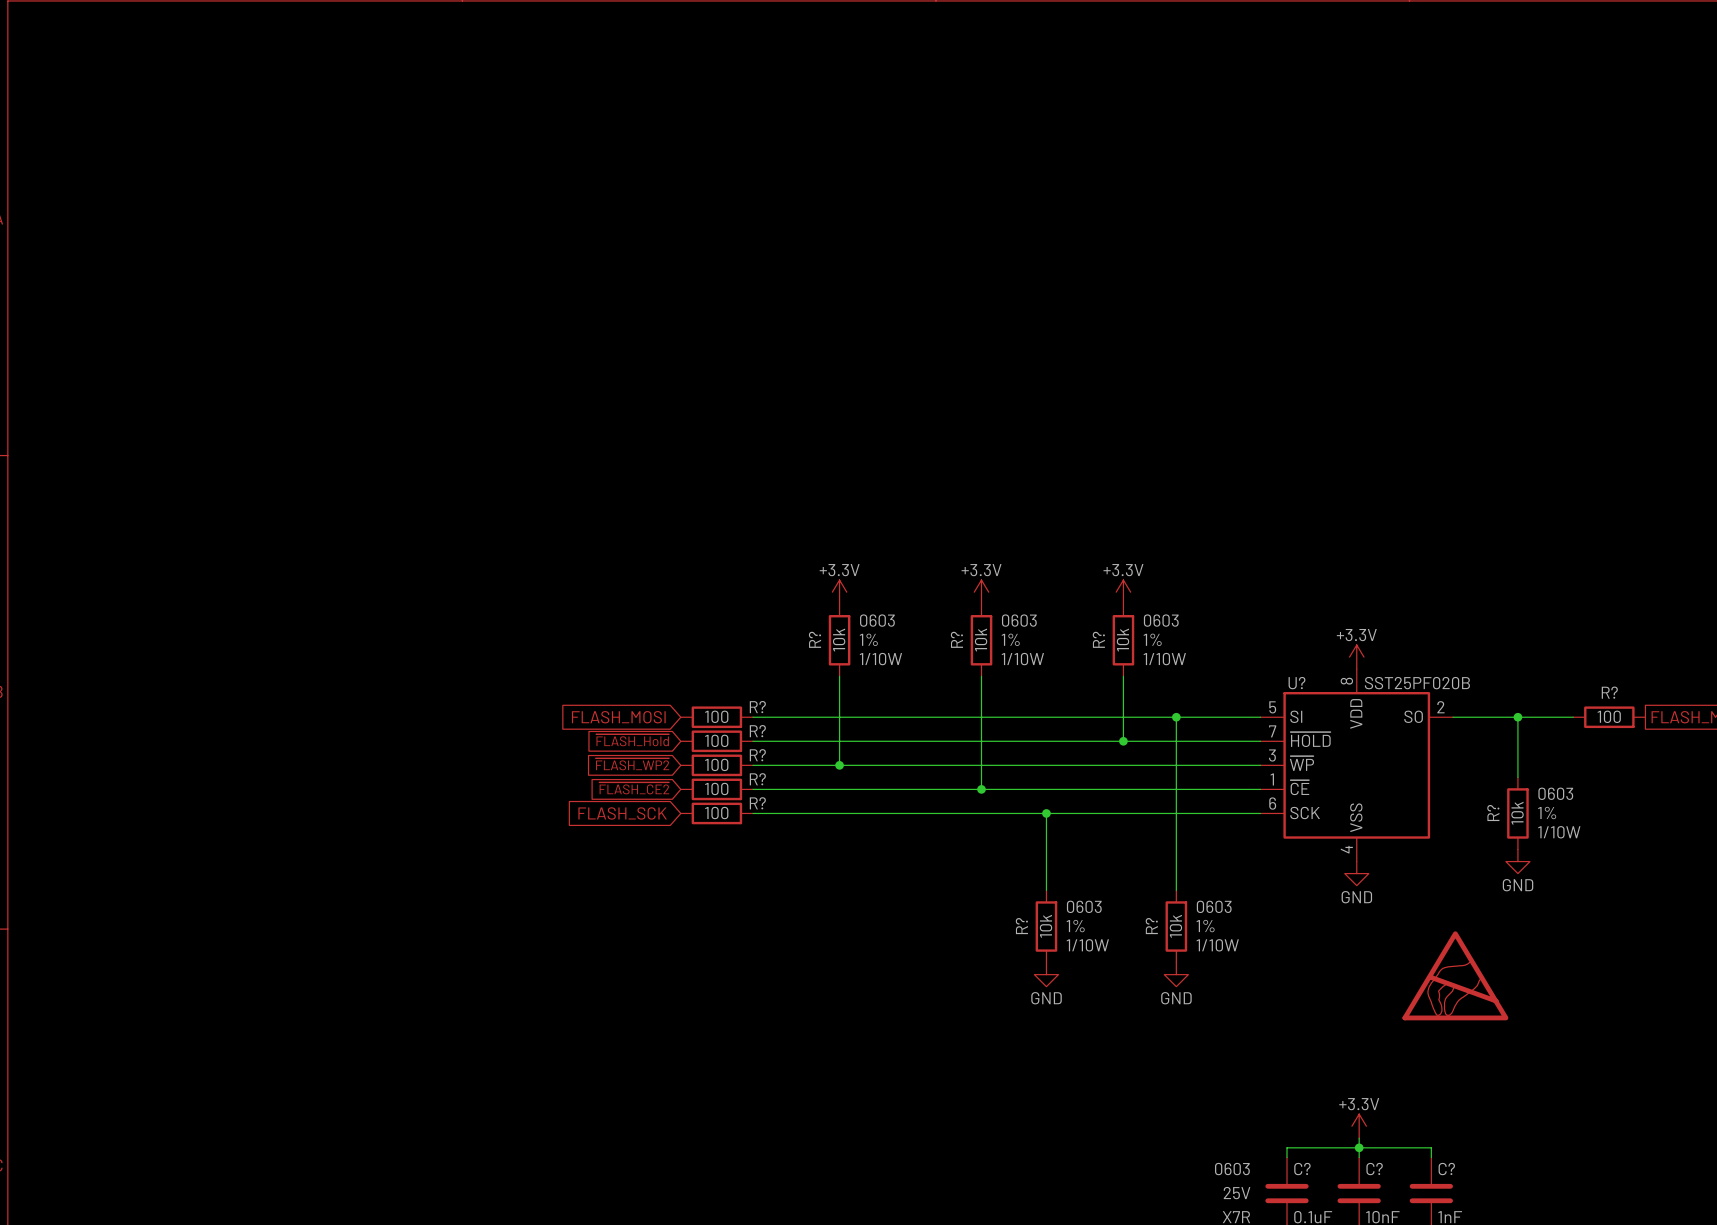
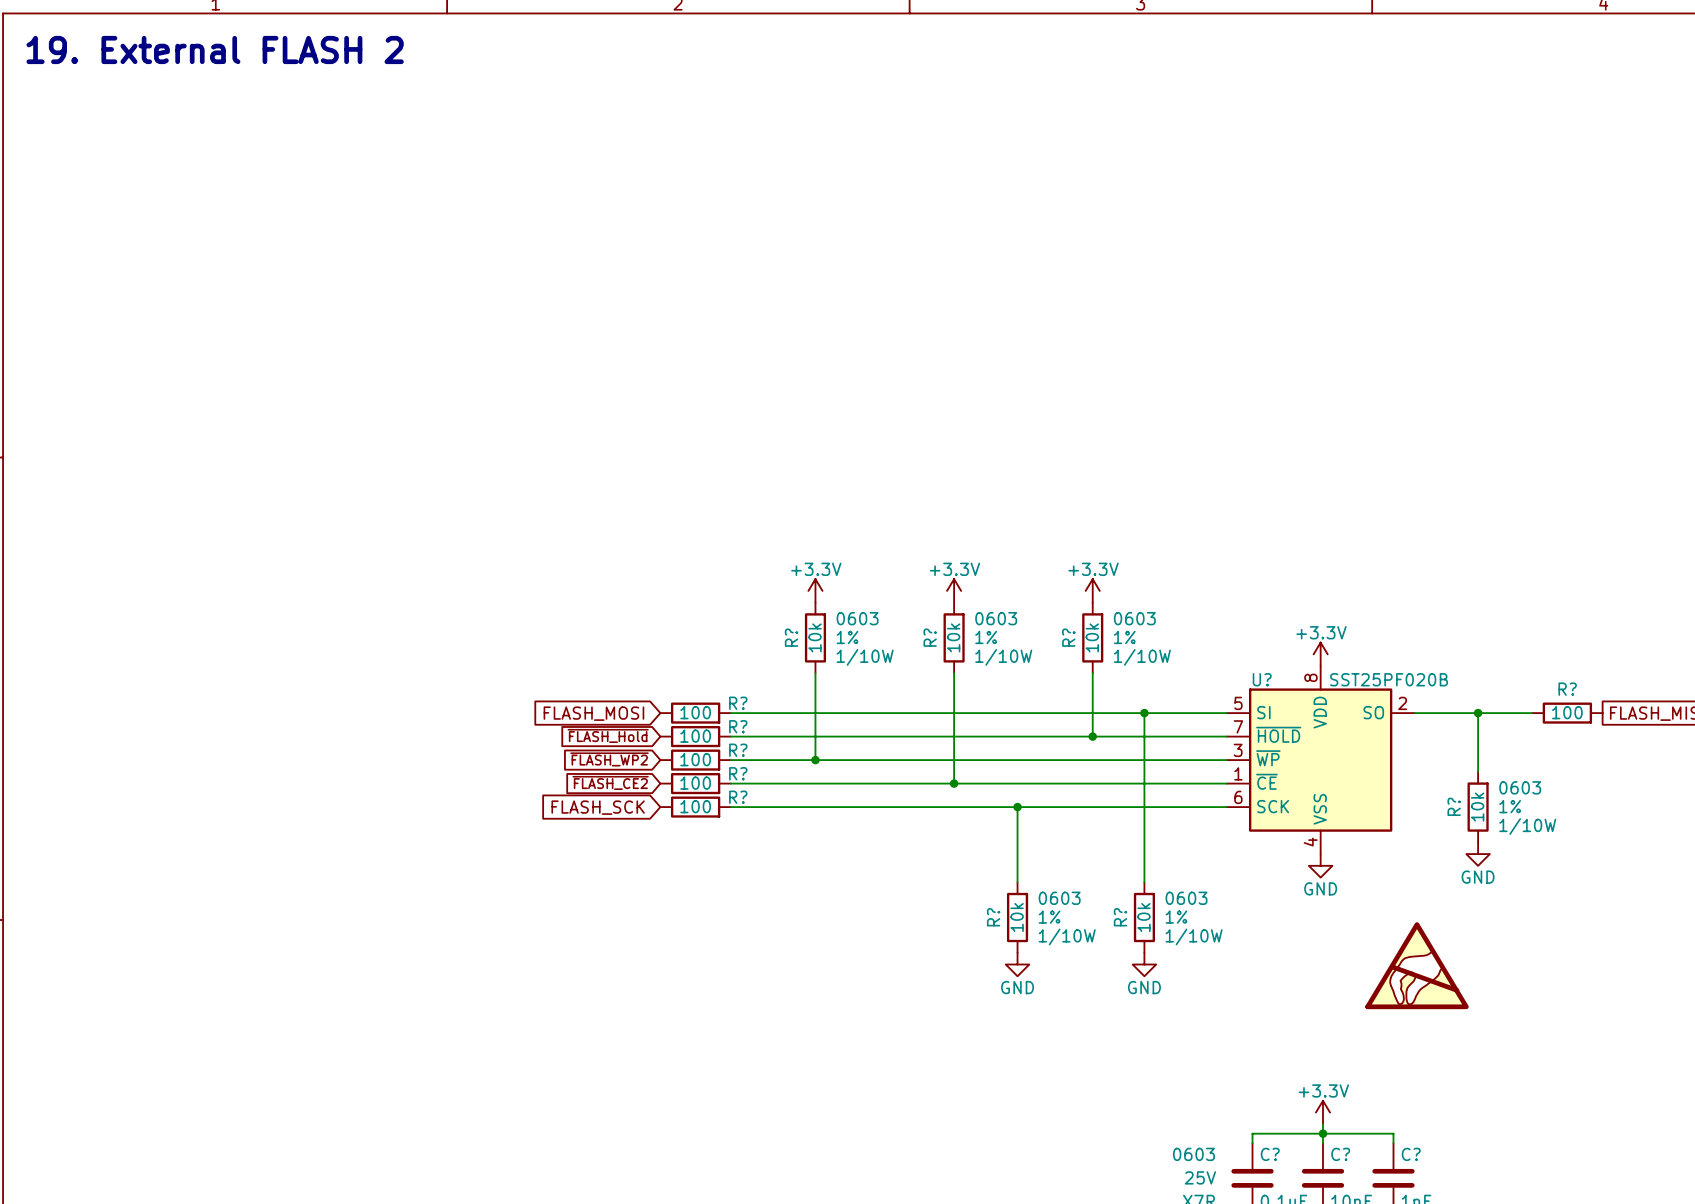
text: none -> 19. External FLASH 2 (215, 49)

